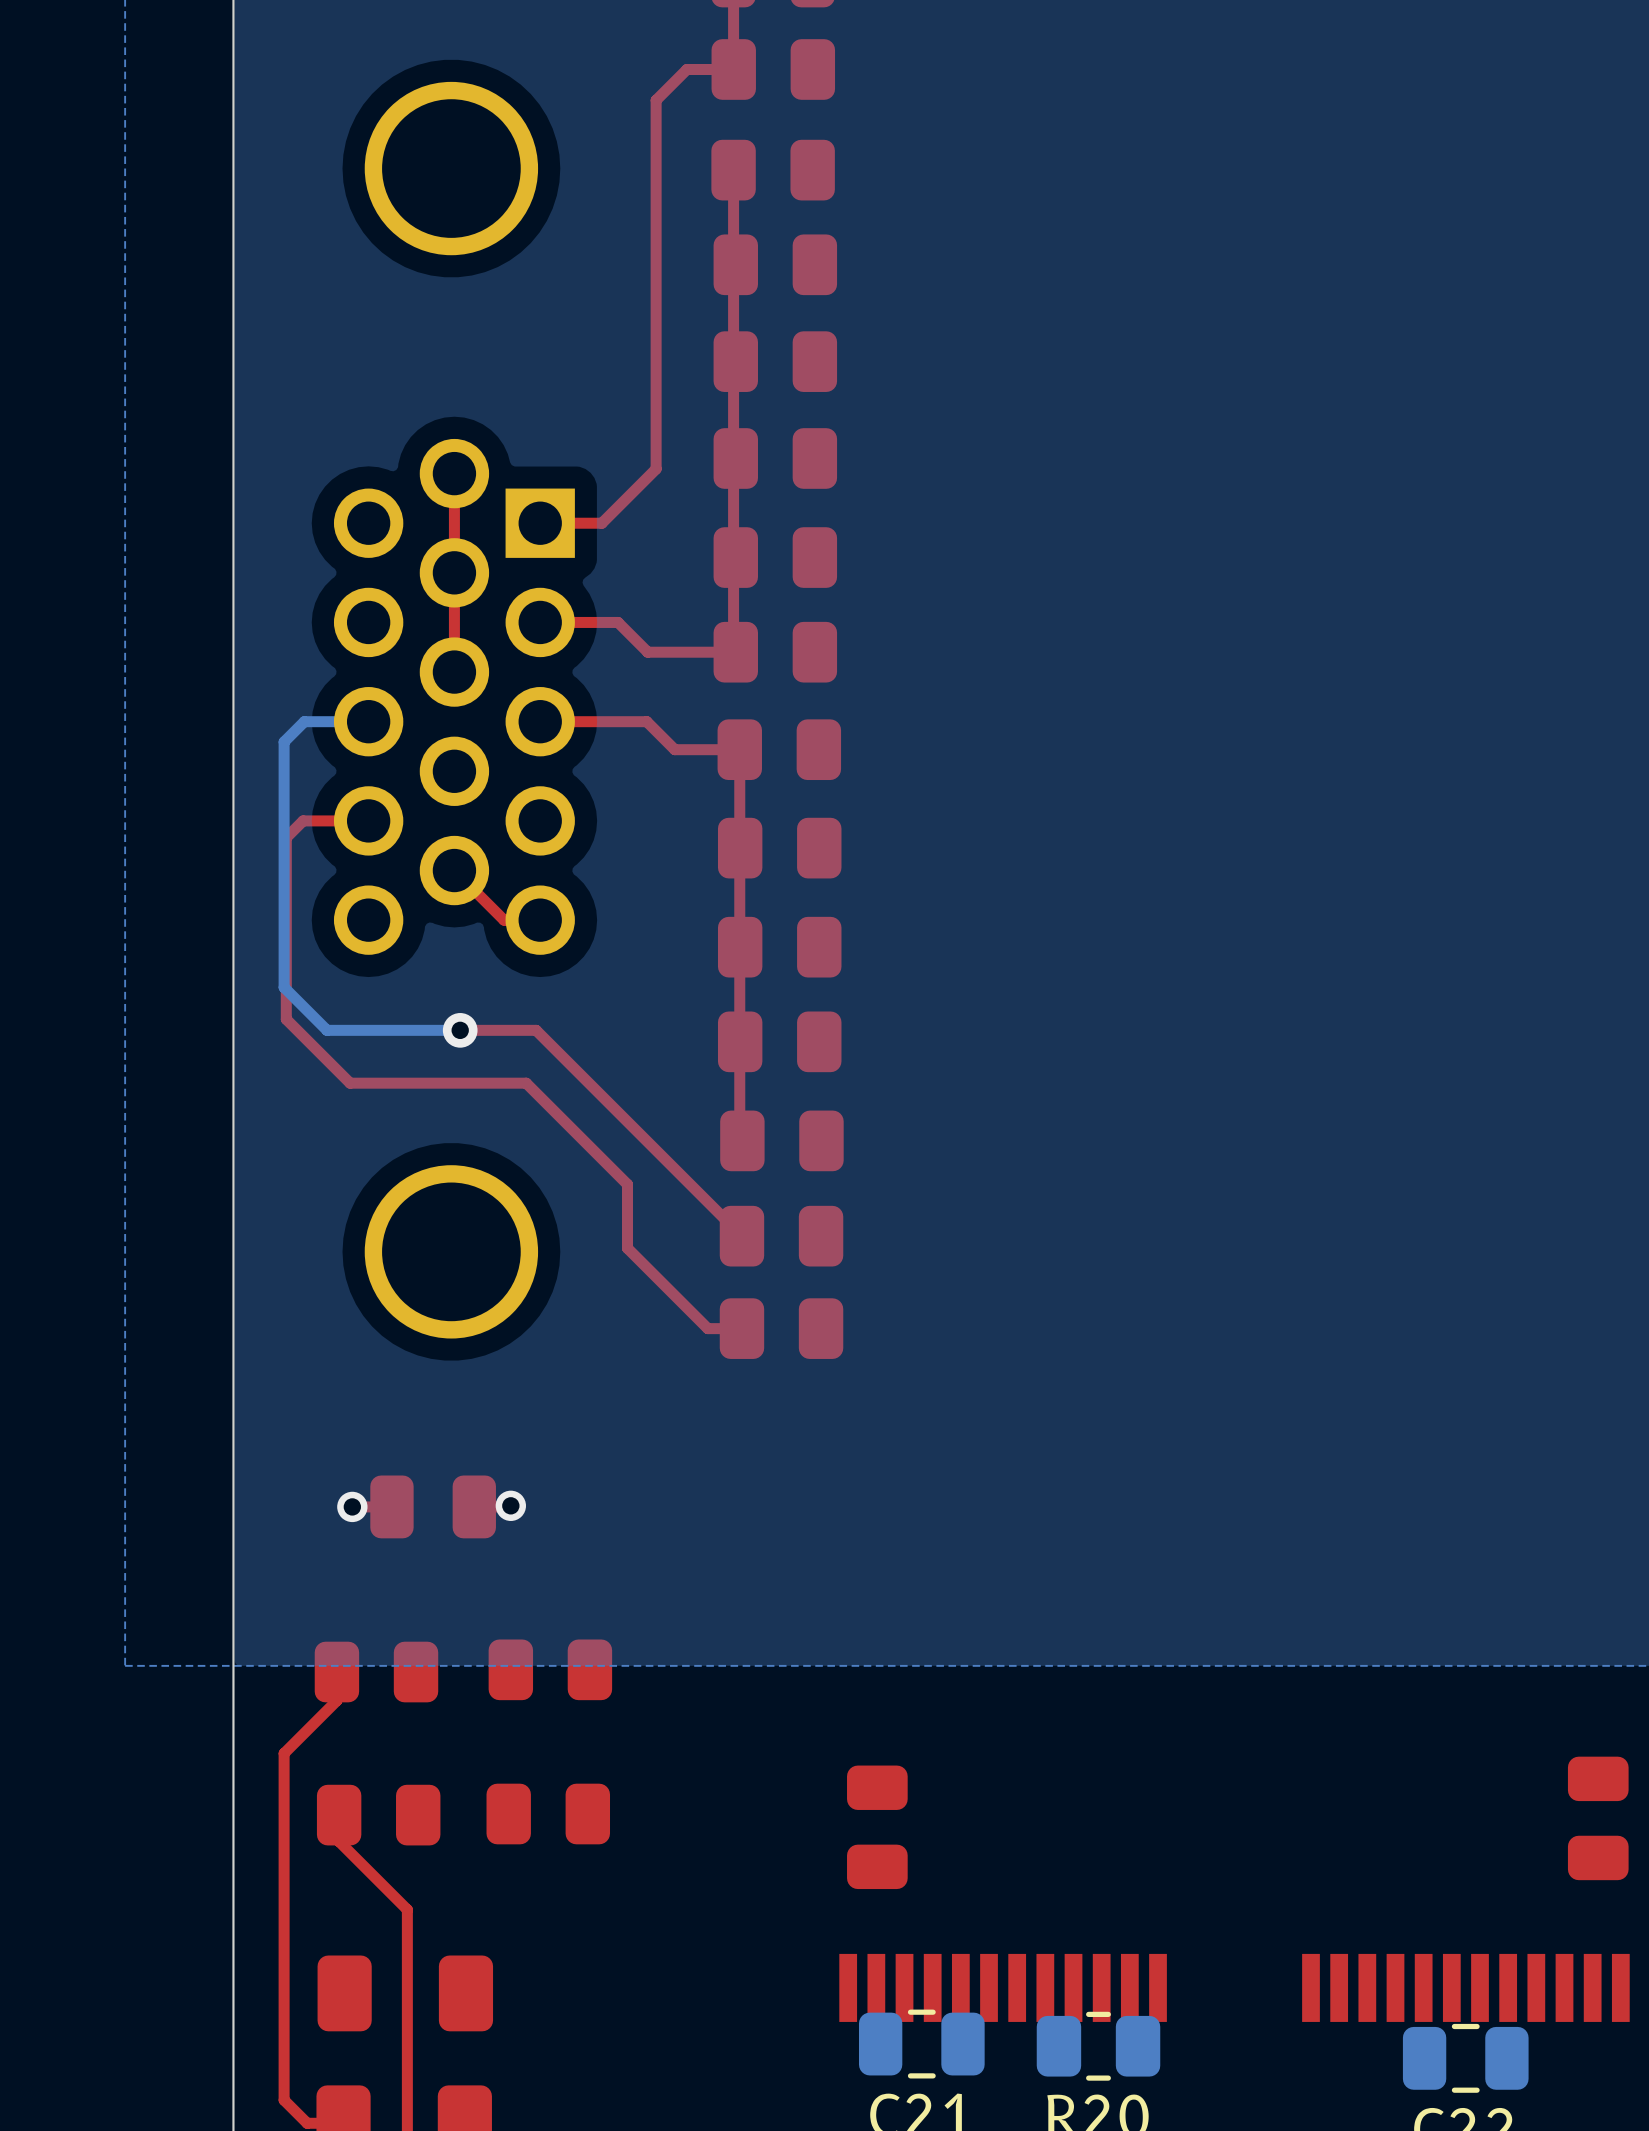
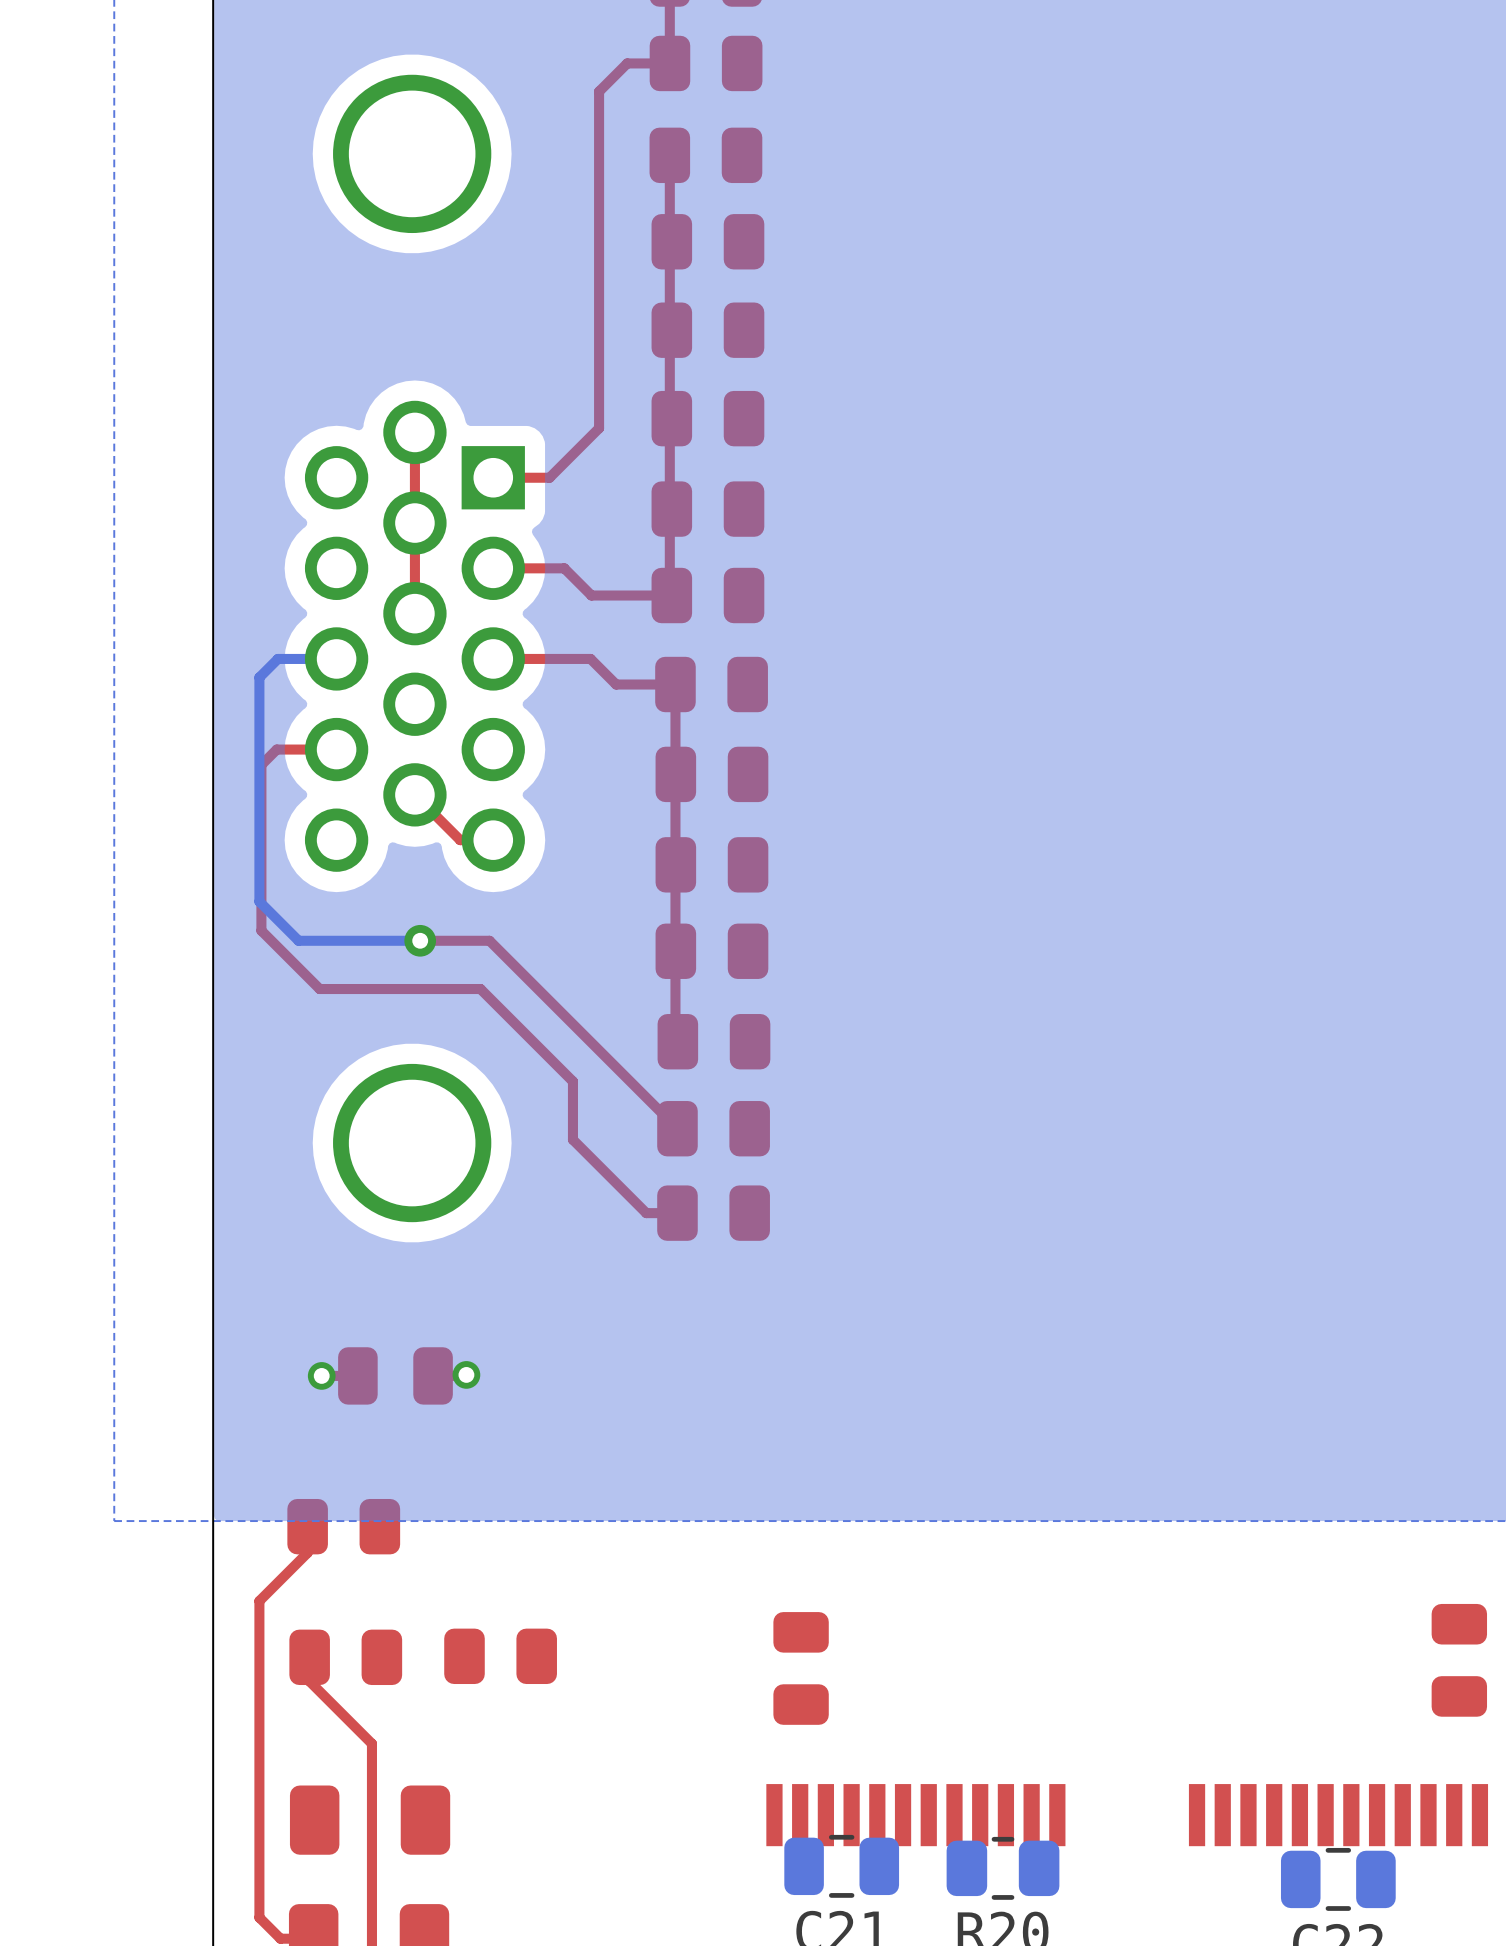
part: (550, 1669) -> none

